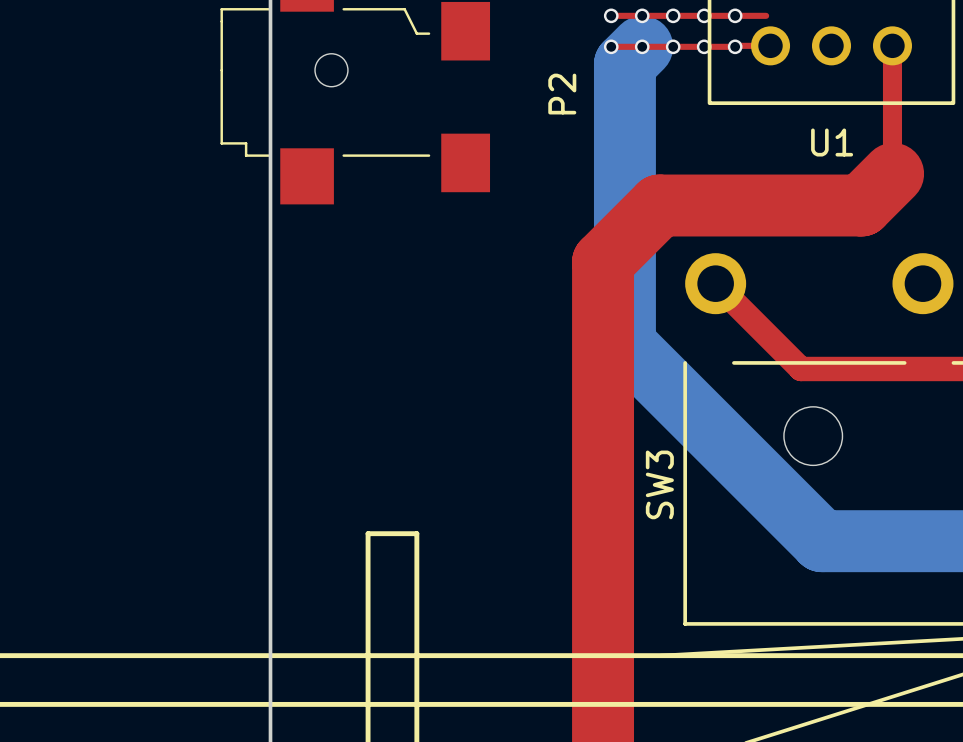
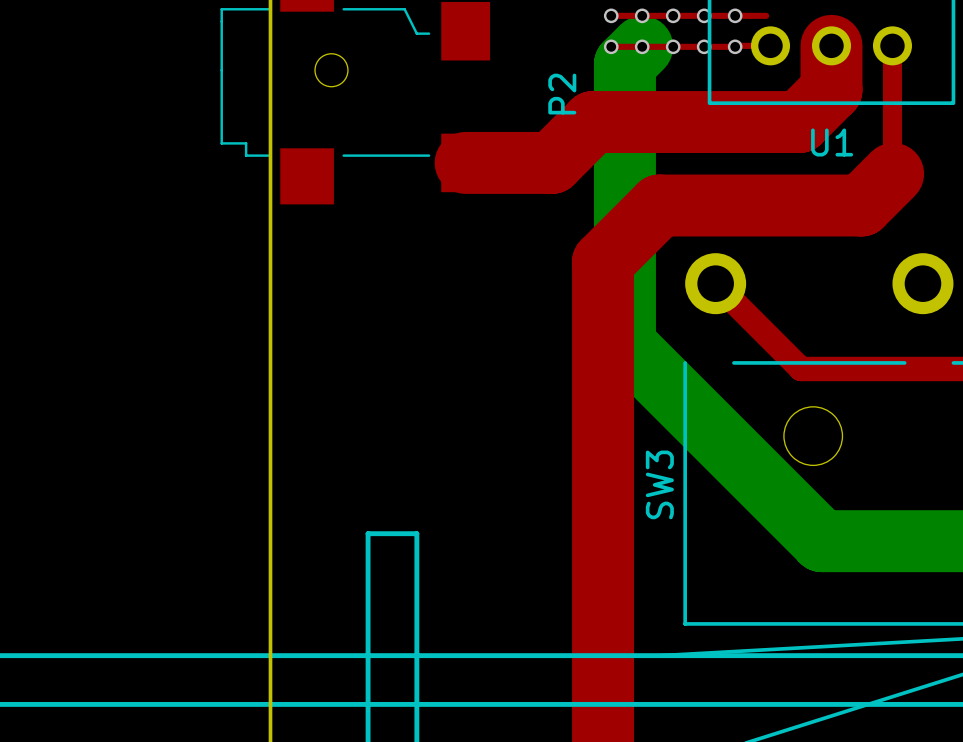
top track: none -> (831, 45) (831, 89) (799, 122) (592, 122) (551, 162) (465, 162)

